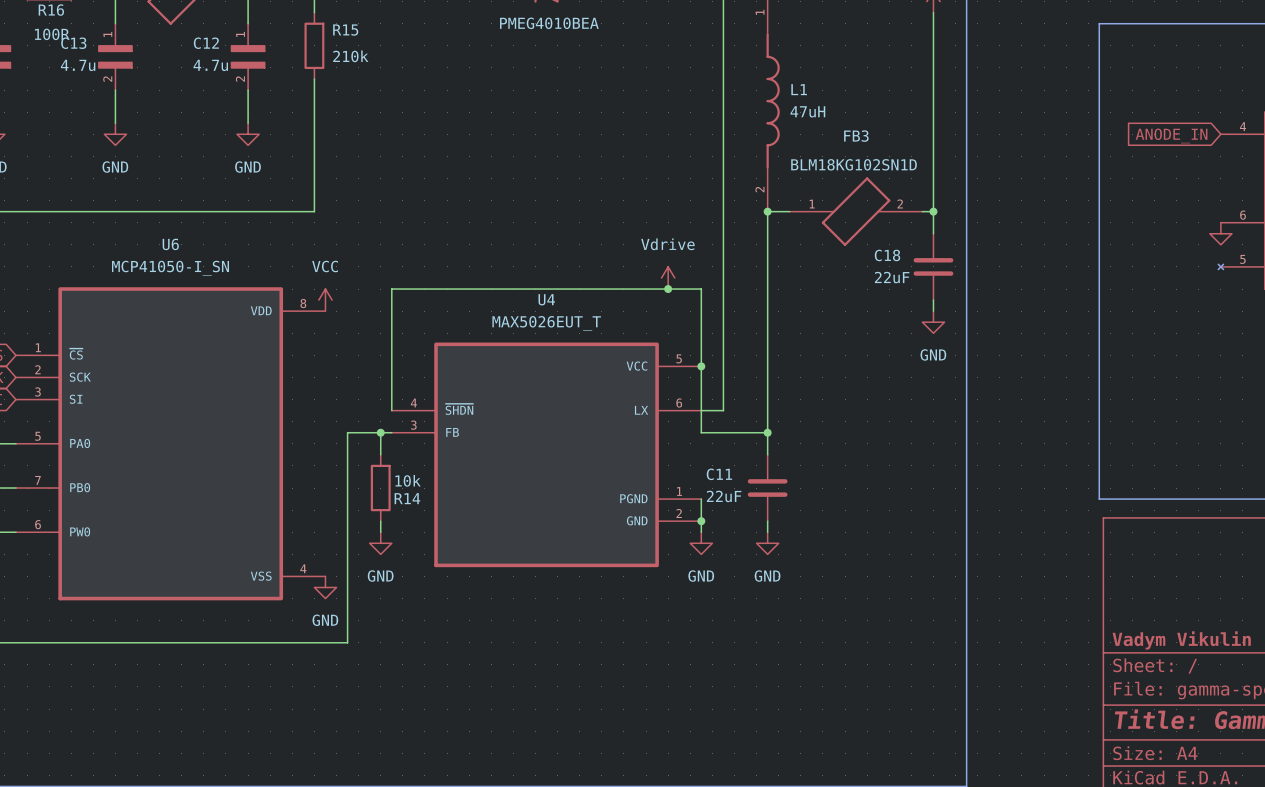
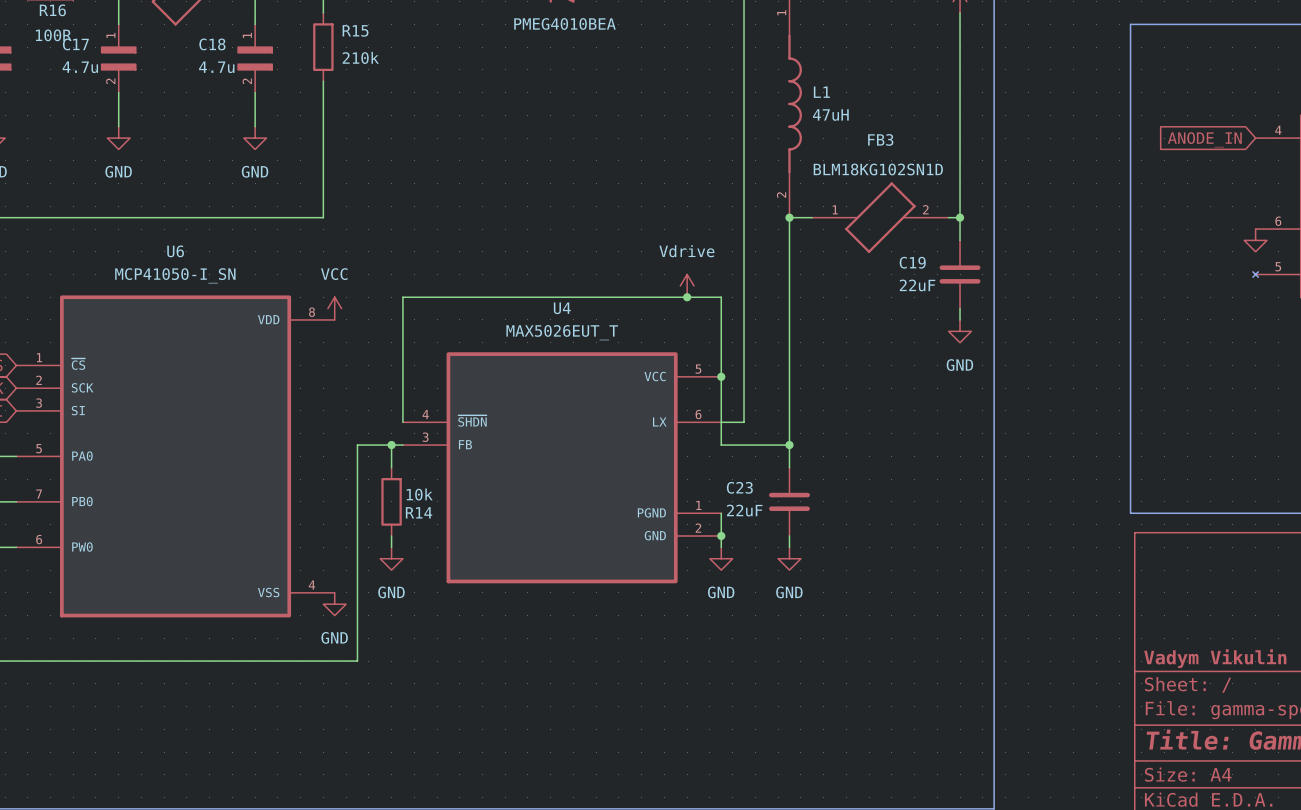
C13 name: C13 (73, 43) -> C17 (75, 44)
C12 name: C12 (206, 43) -> C18 (212, 44)
C18 name: C18 (887, 255) -> C19 (912, 262)
C11 name: C11 (719, 474) -> C23 (739, 487)

